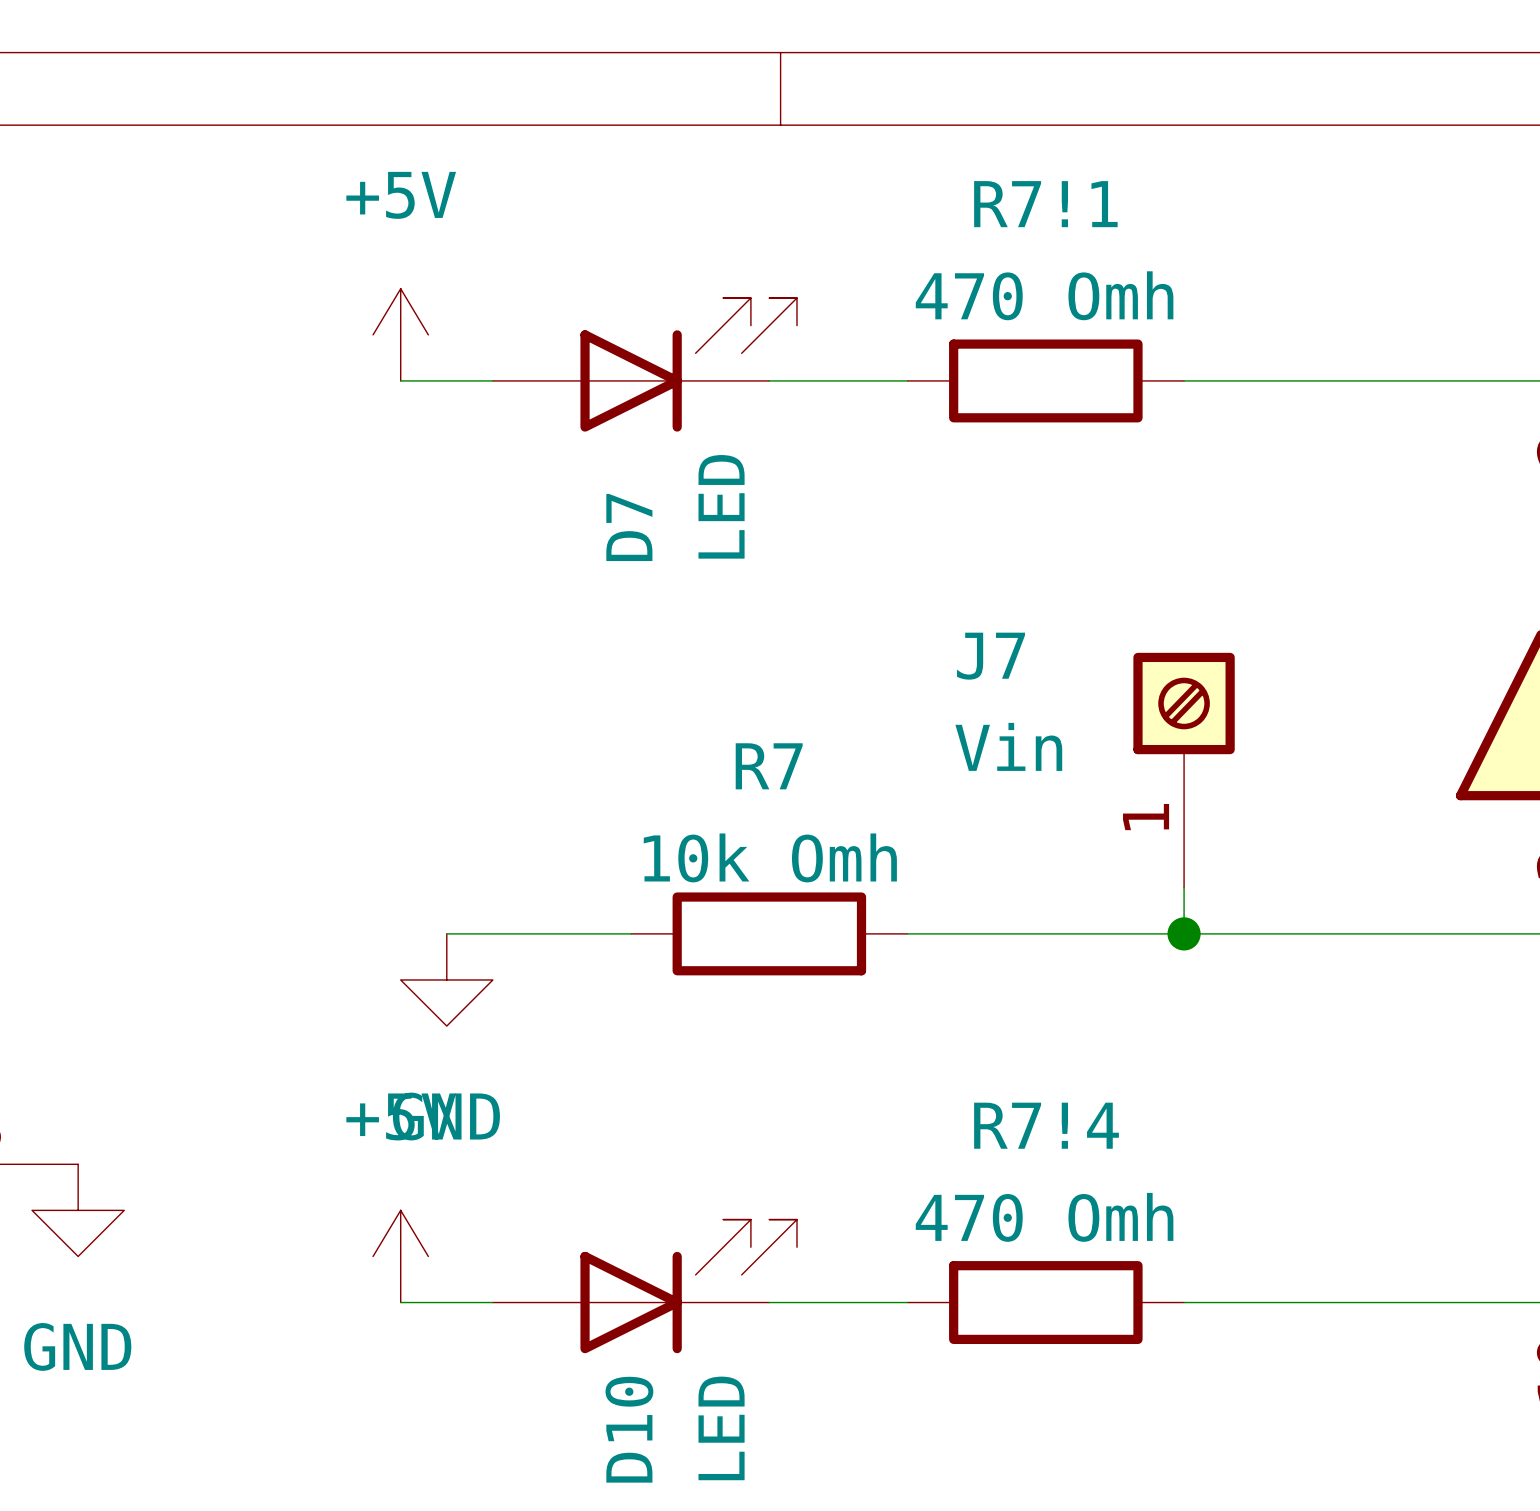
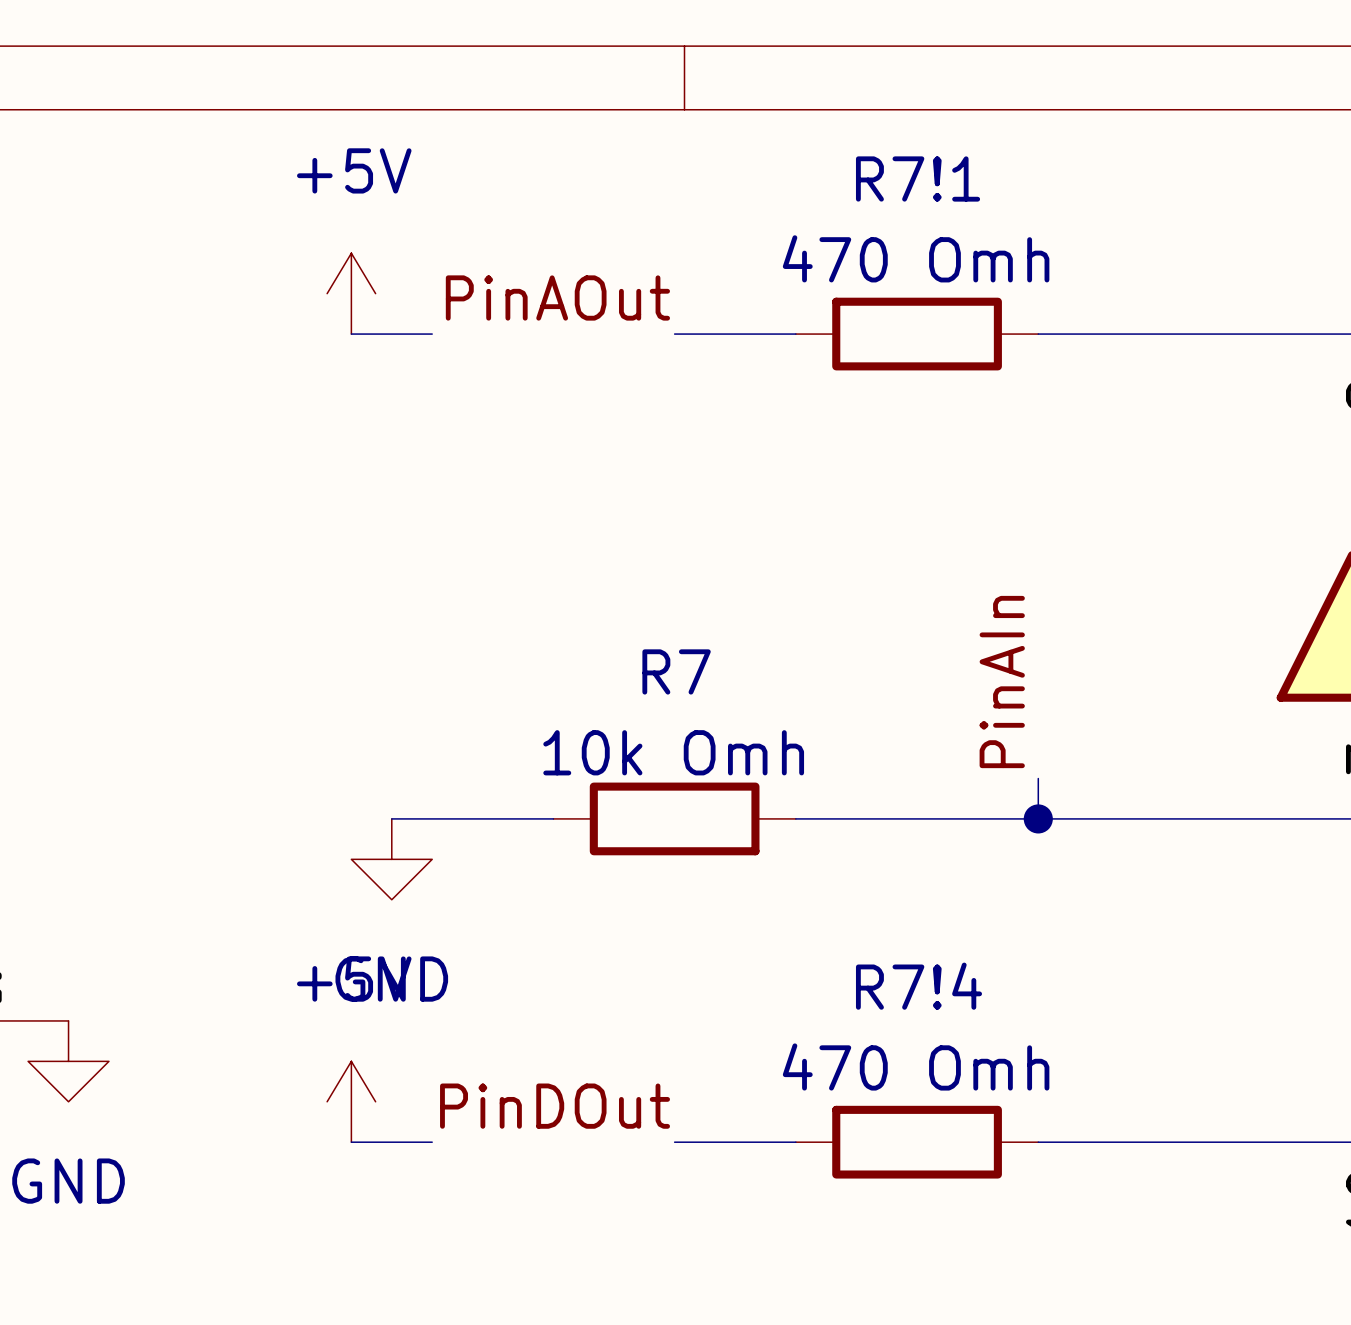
label: none -> PinAOut (557, 297)
D7: LED (644, 364) -> none
J7: Vin (1184, 770) -> none
label: none -> PinAIn (1002, 682)
label: none -> PinDOut (555, 1106)
D10: LED (644, 1286) -> none

